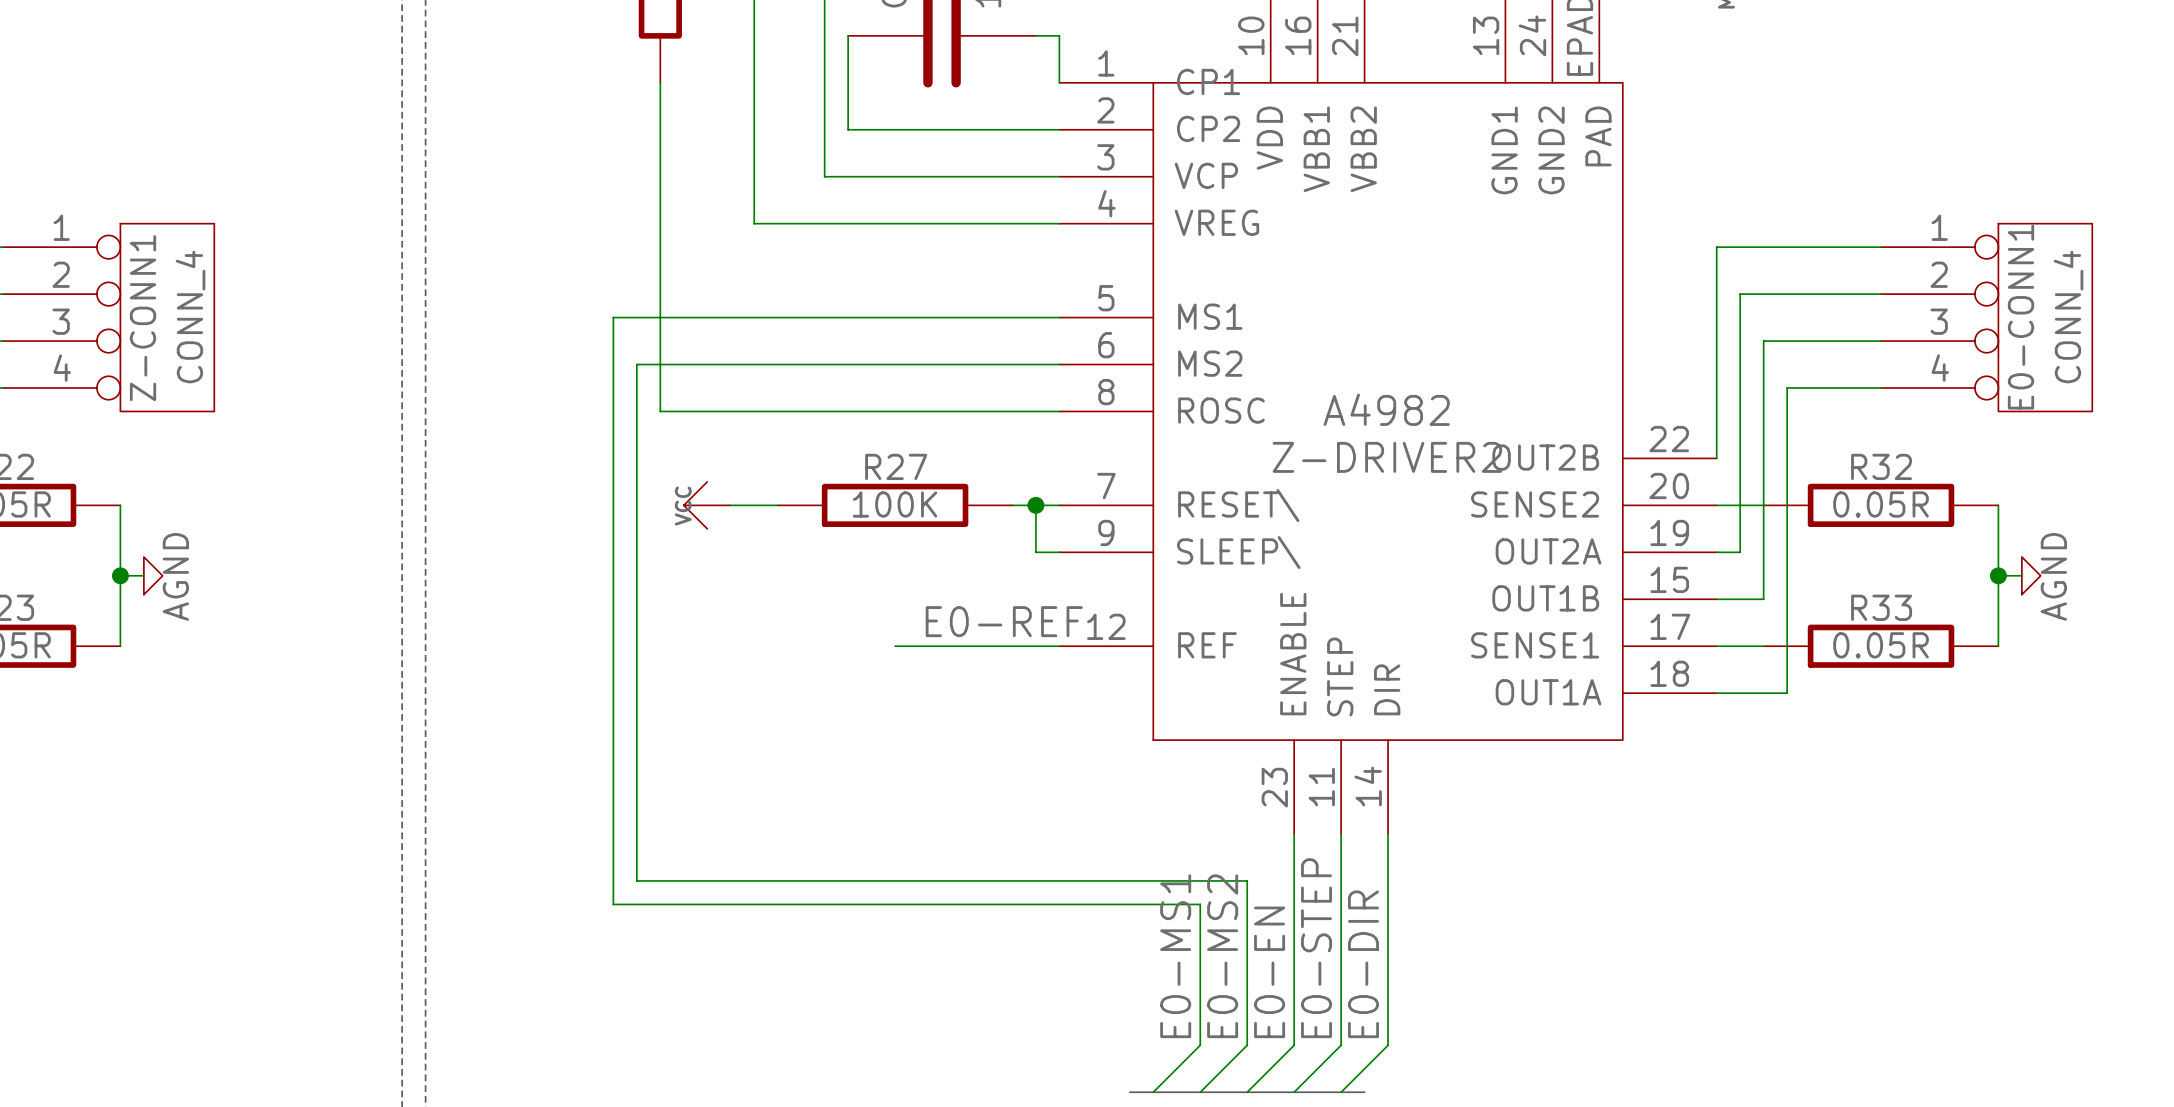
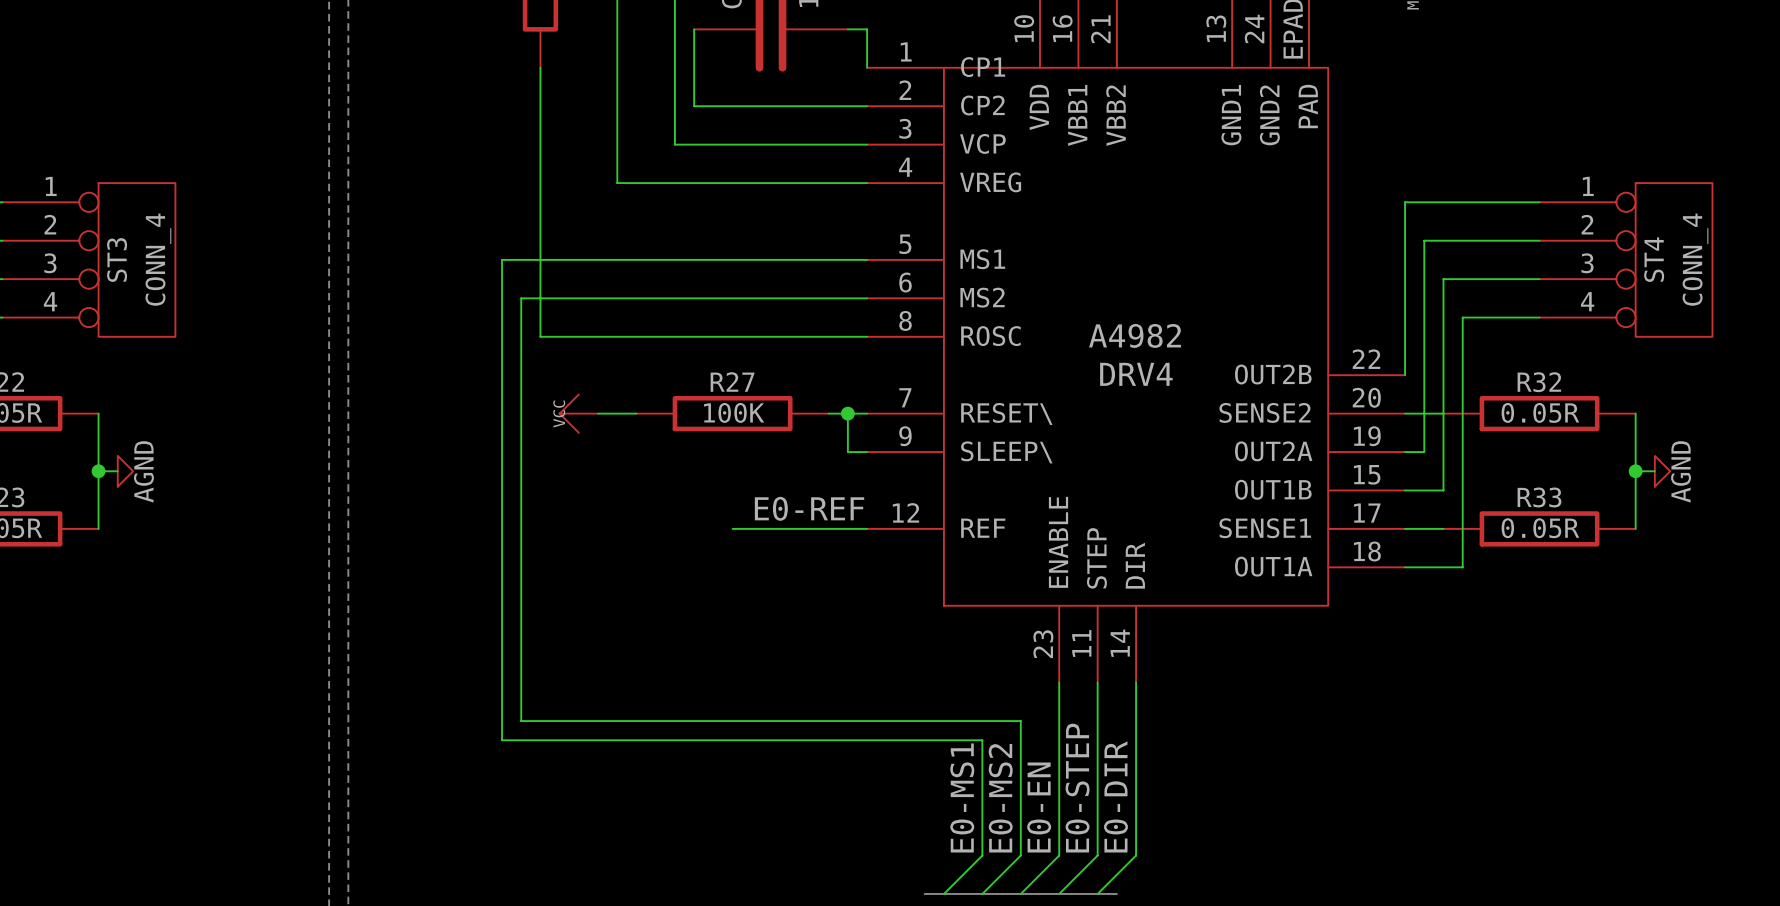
E0-CONN1 name: E0-CONN1 (2021, 317) -> ST4 (1654, 259)
Z-CONN1 name: Z-CONN1 (143, 318) -> ST3 (117, 260)
Z-DRIVER2 name: Z-DRIVER2 (1387, 457) -> DRV4 (1136, 374)

